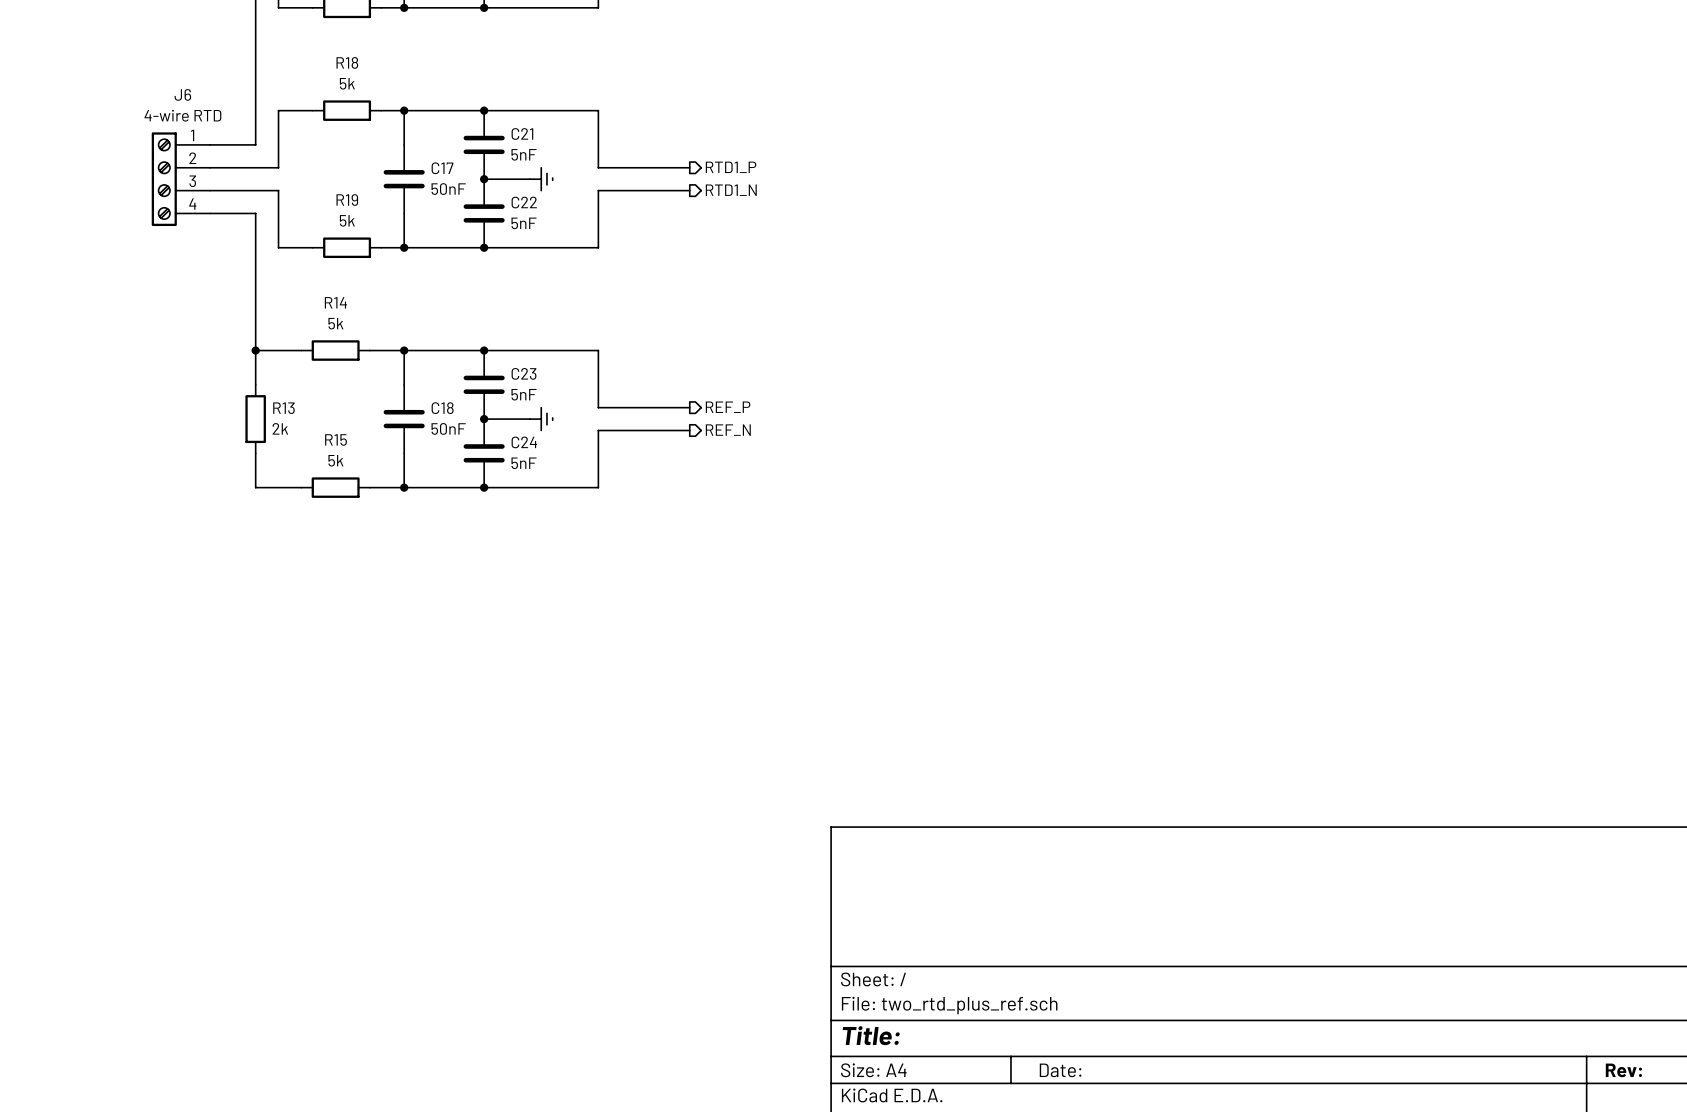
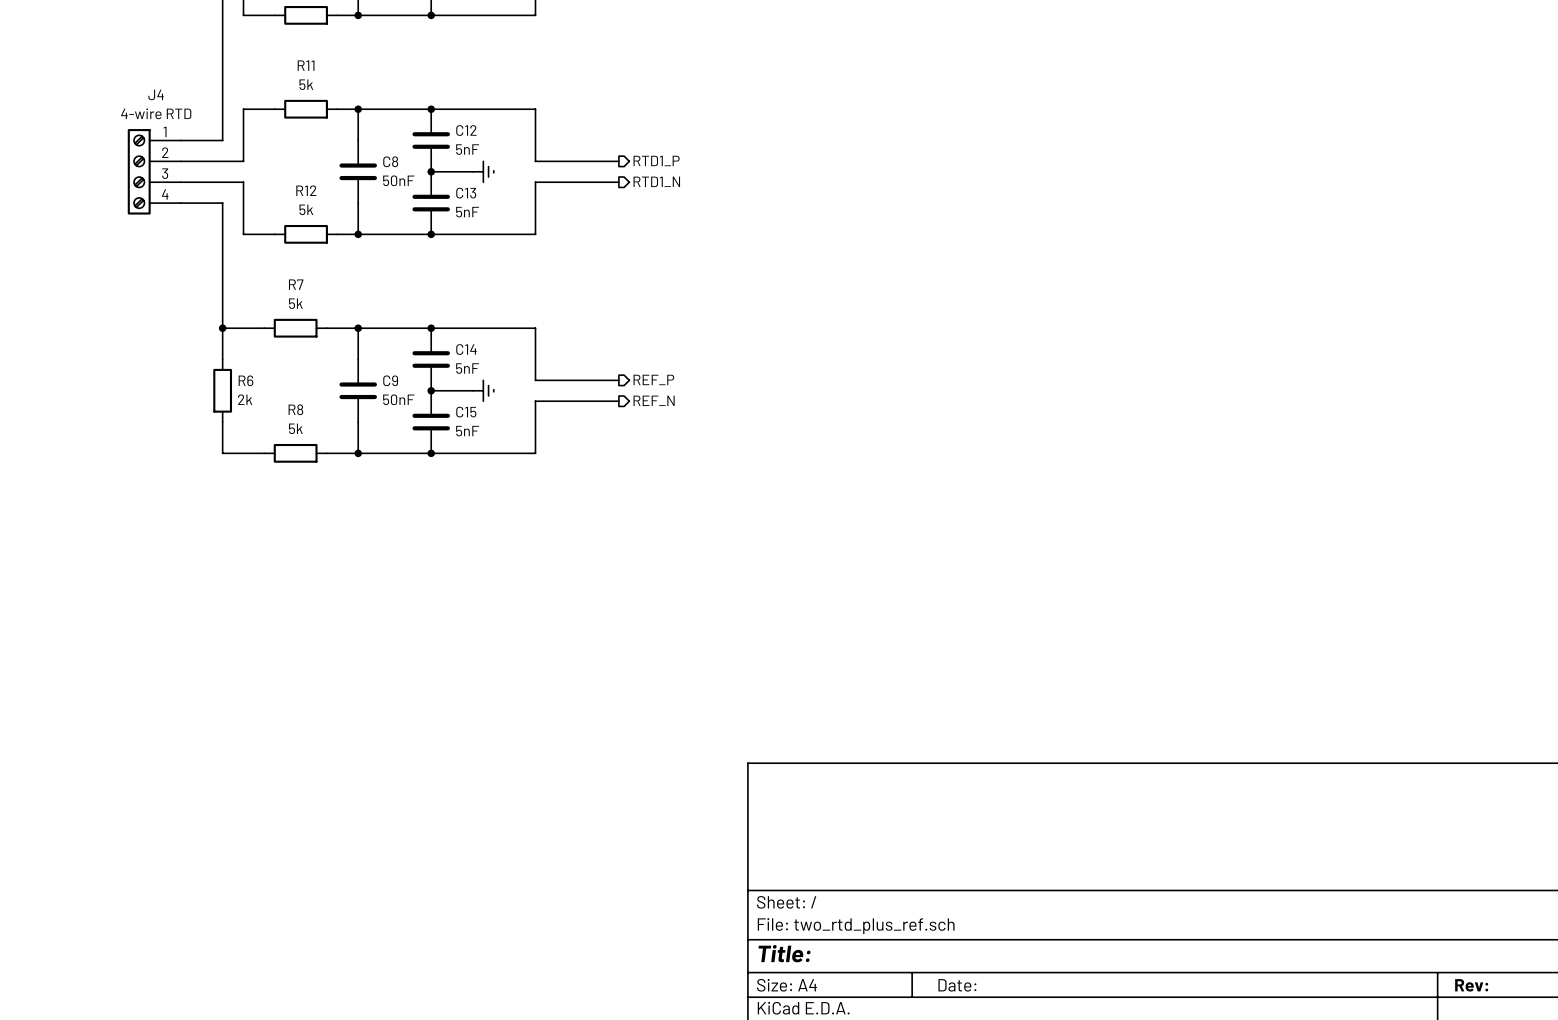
R18 name: R18 (347, 62) -> R11 (306, 65)
J6 name: J6 (182, 94) -> J4 (156, 94)
C21 name: C21 (522, 133) -> C12 (466, 130)
C17 name: C17 (442, 168) -> C8 (390, 161)
R19 name: R19 (347, 200) -> R12 (306, 190)
C22 name: C22 (524, 202) -> C13 (466, 193)
R14 name: R14 (335, 302) -> R7 (296, 284)
C23 name: C23 (524, 373) -> C14 (466, 349)
R13 name: R13 (283, 408) -> R6 (245, 380)
C18 name: C18 (442, 408) -> C9 (390, 380)
R15 name: R15 (336, 439) -> R8 (295, 409)
C24 name: C24 (524, 442) -> C15 (466, 412)

